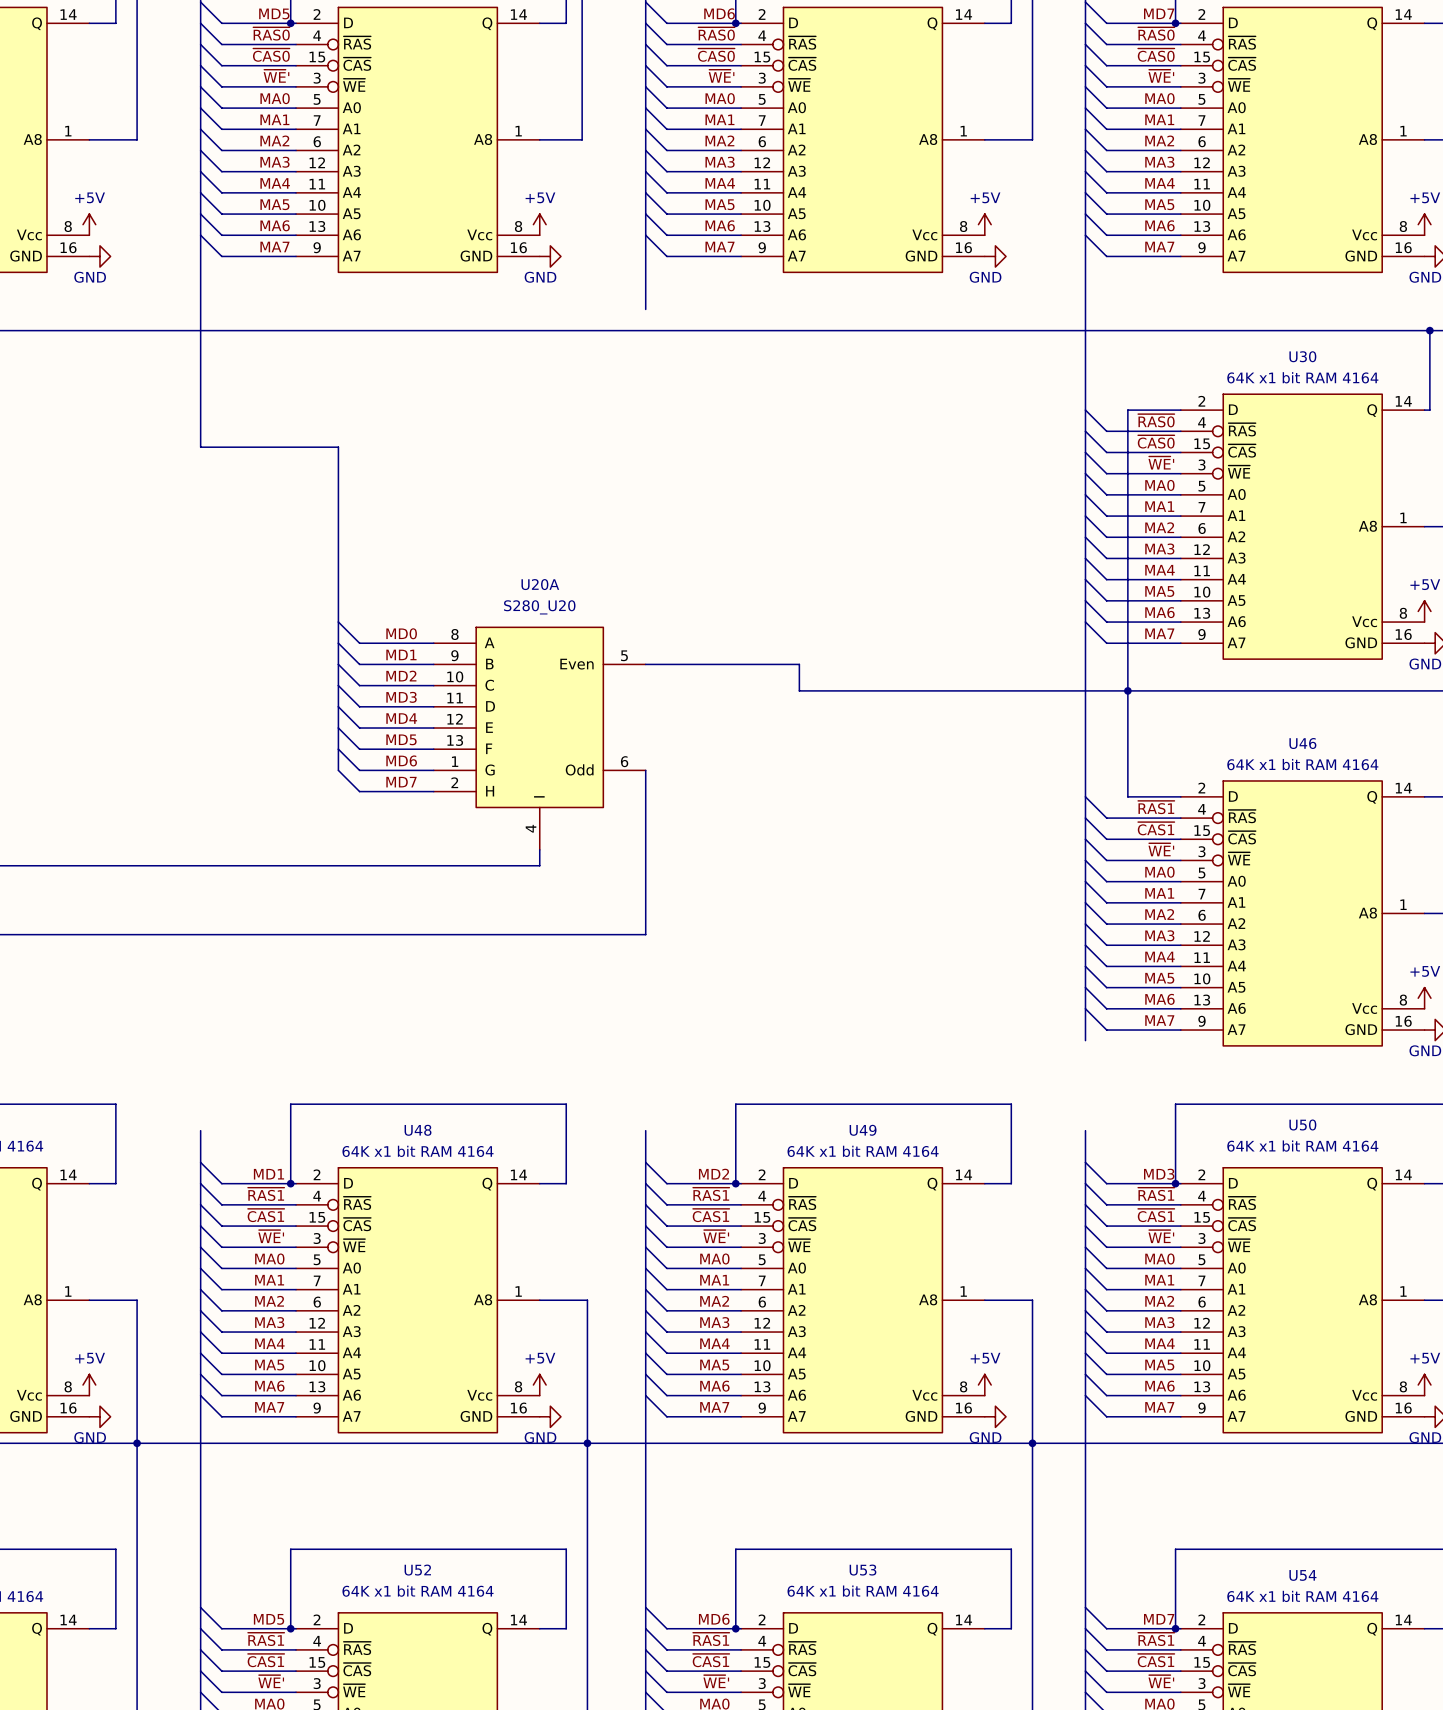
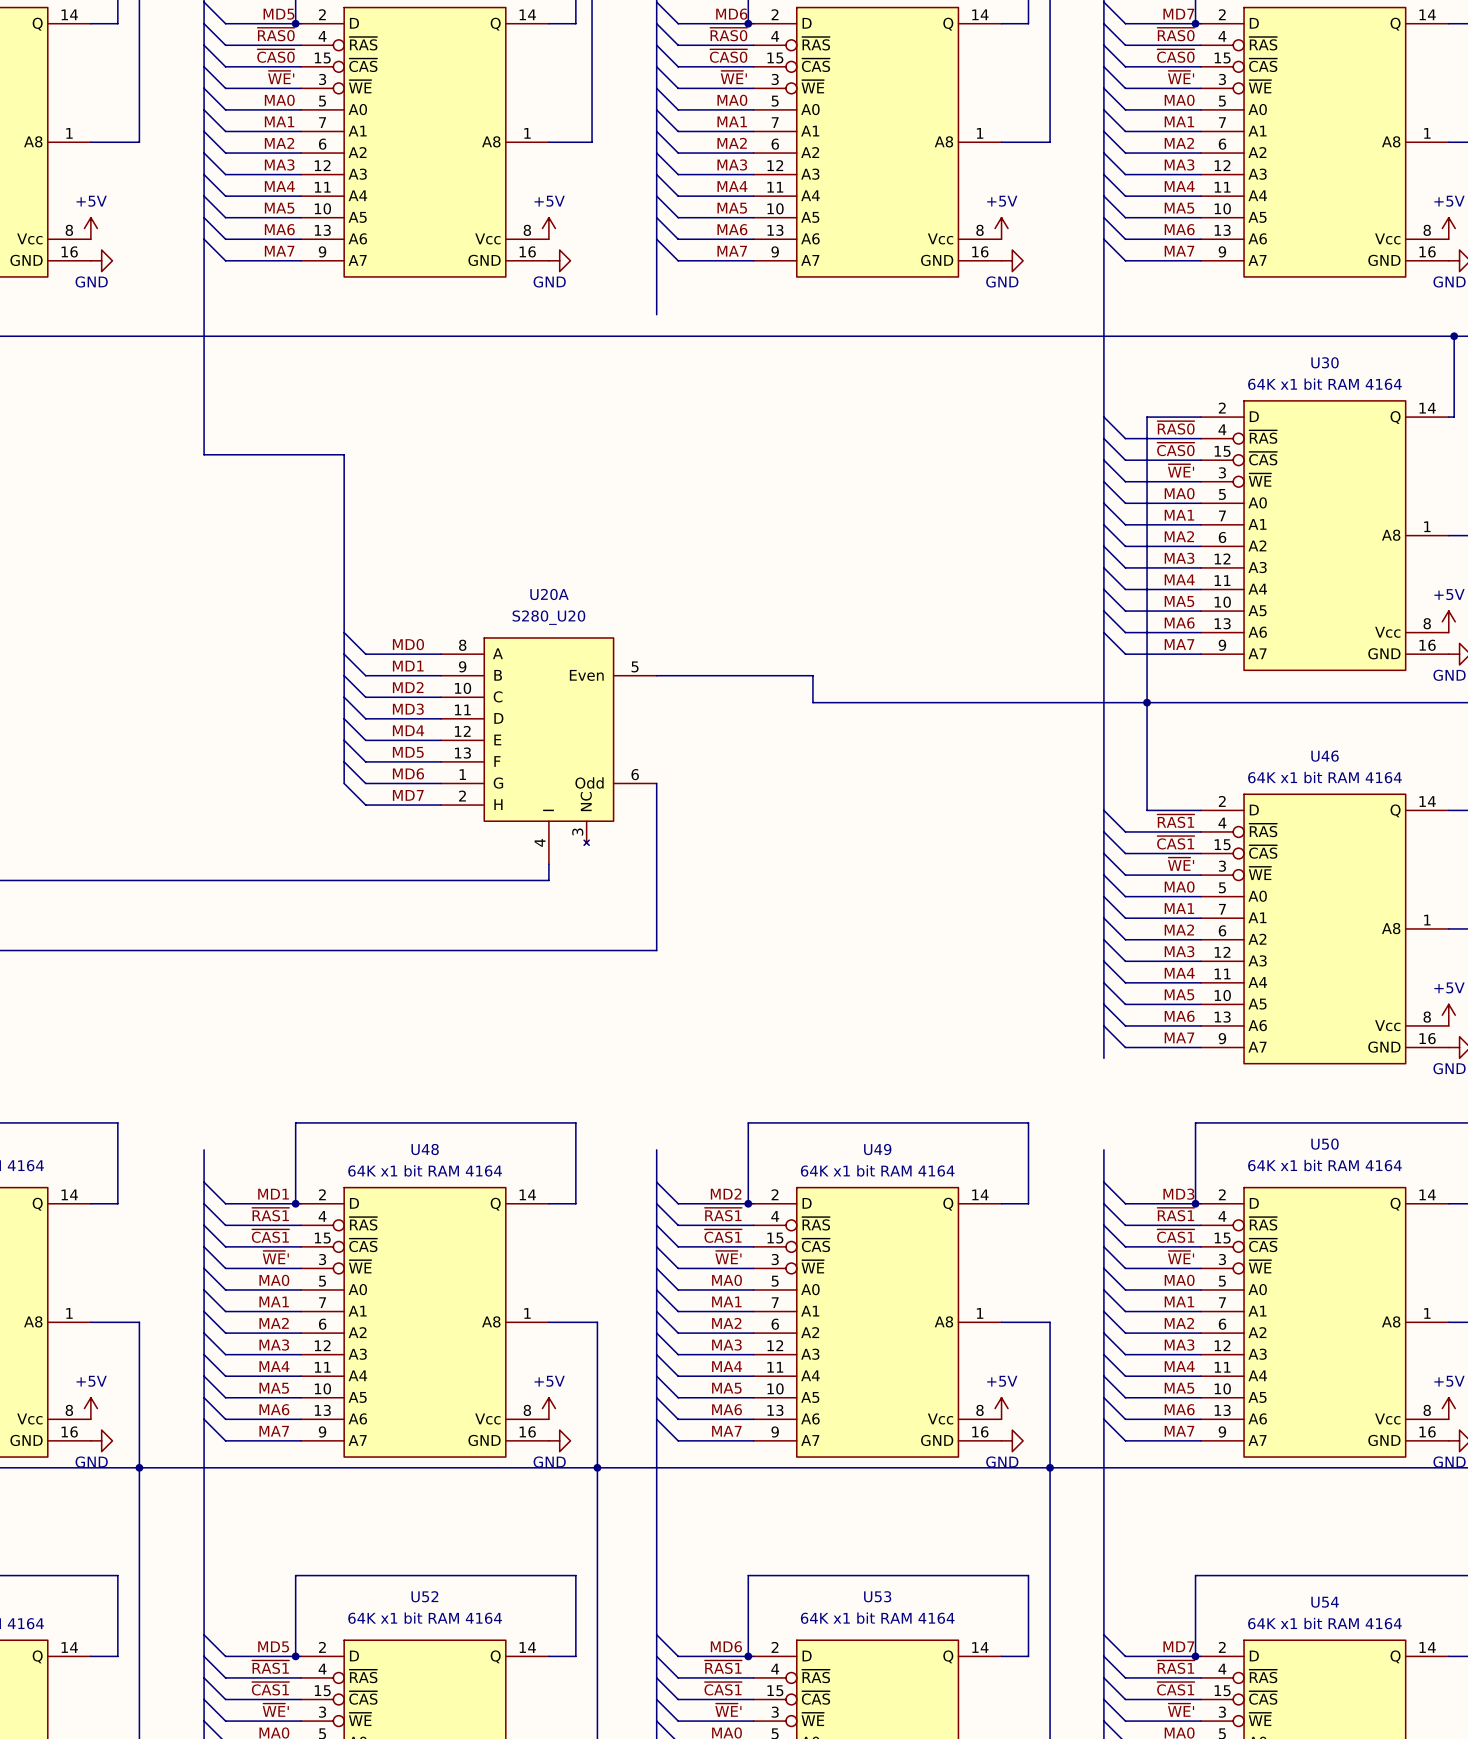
U20A symbol: [433, 627, 646, 850] -> [441, 637, 657, 865]

